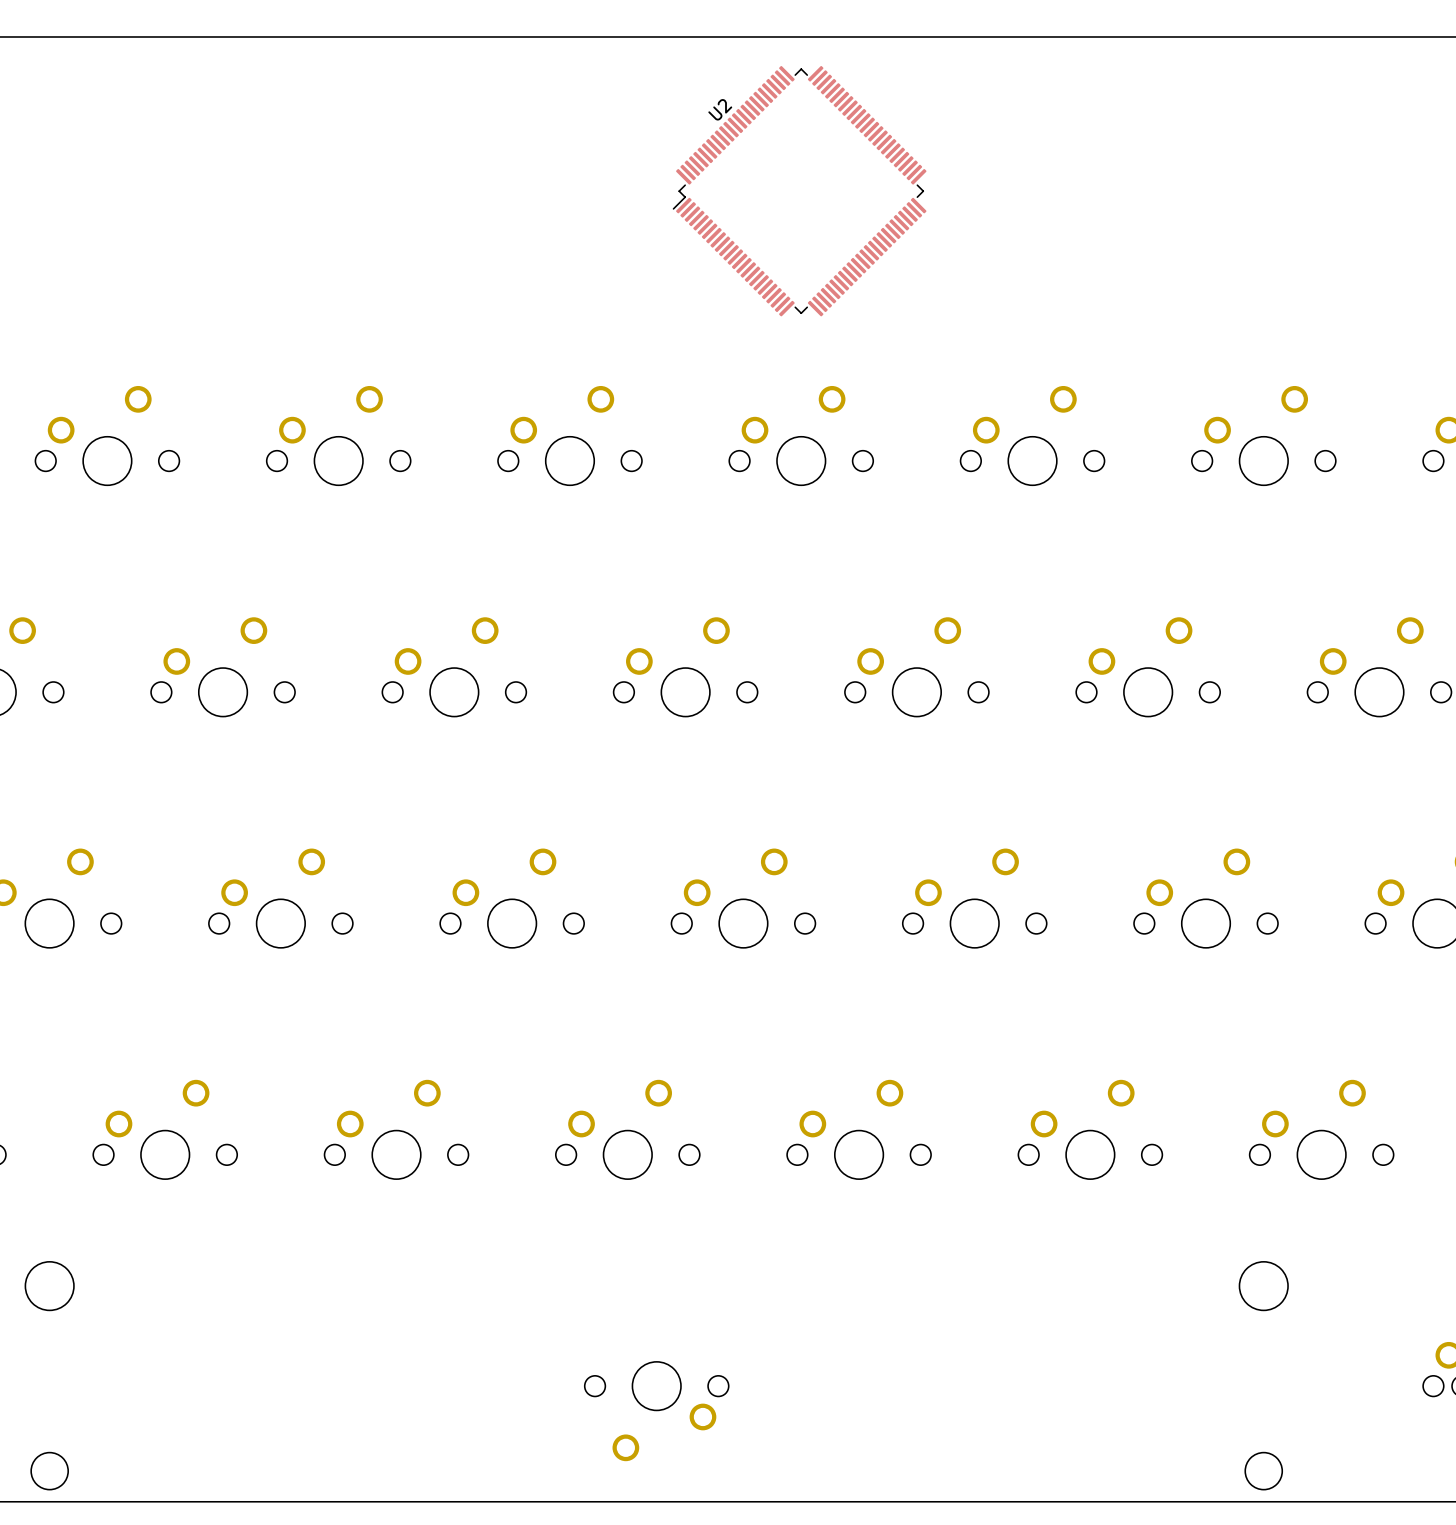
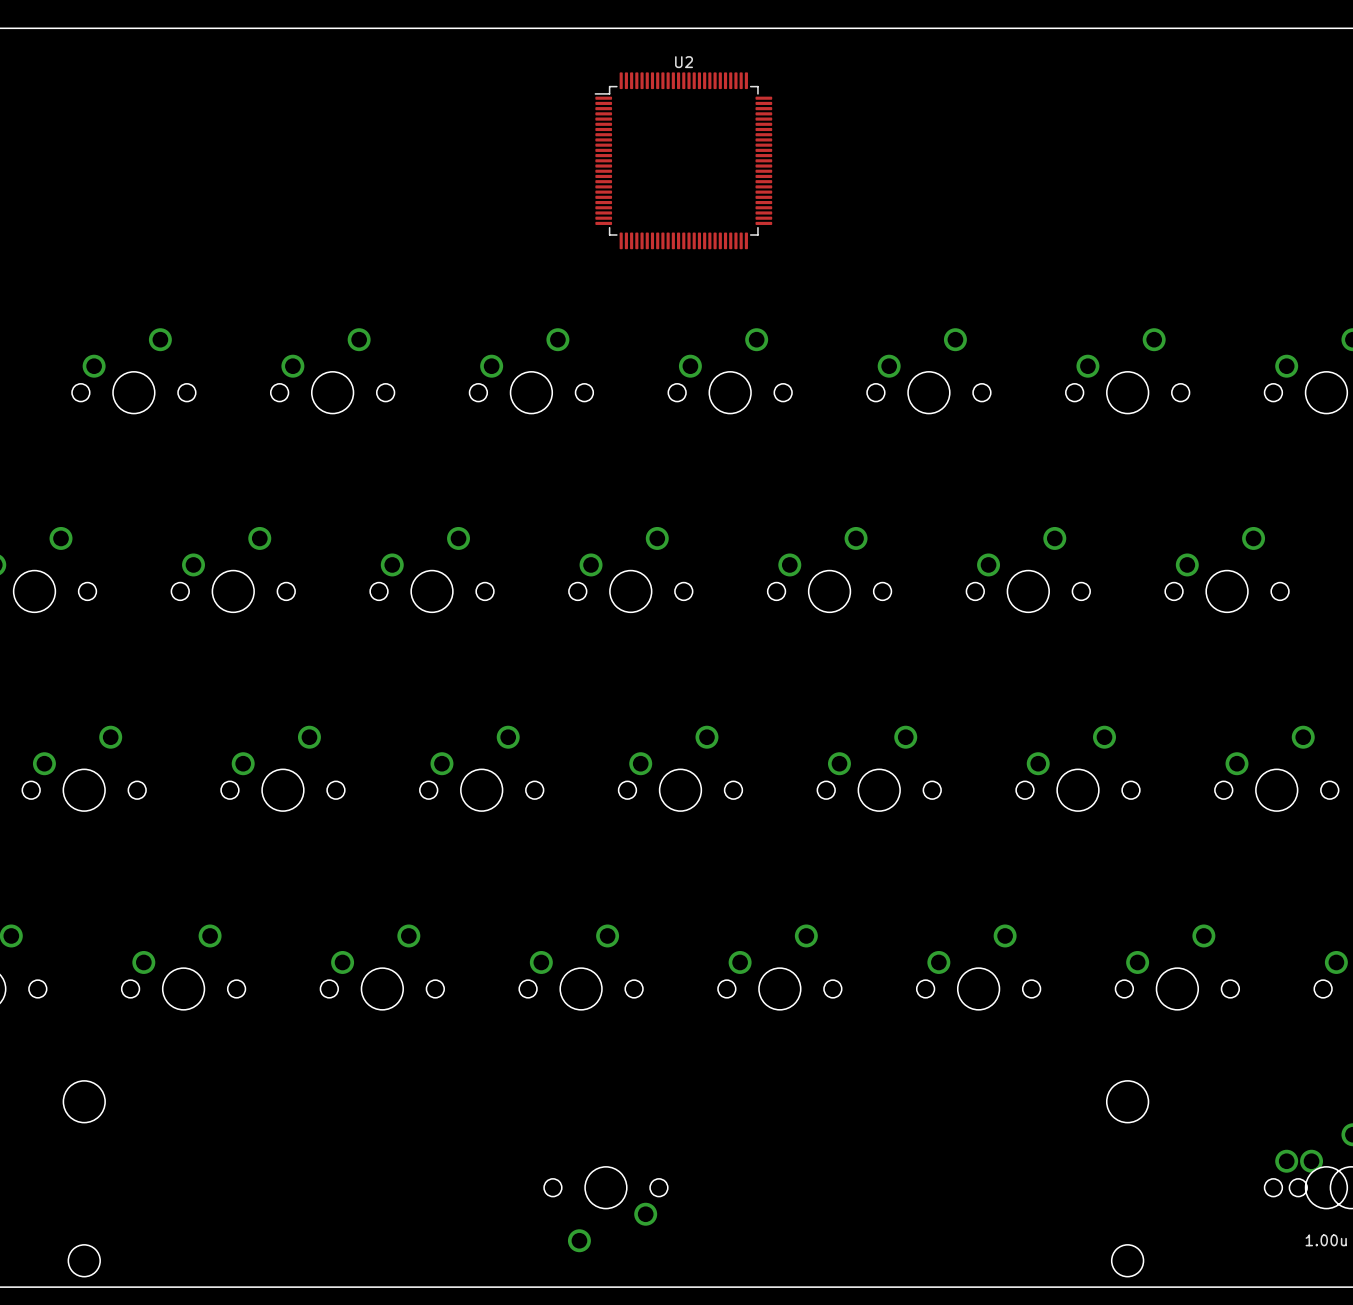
U2 rotation: 0° (799, 191) -> 45° clockwise (683, 160)

